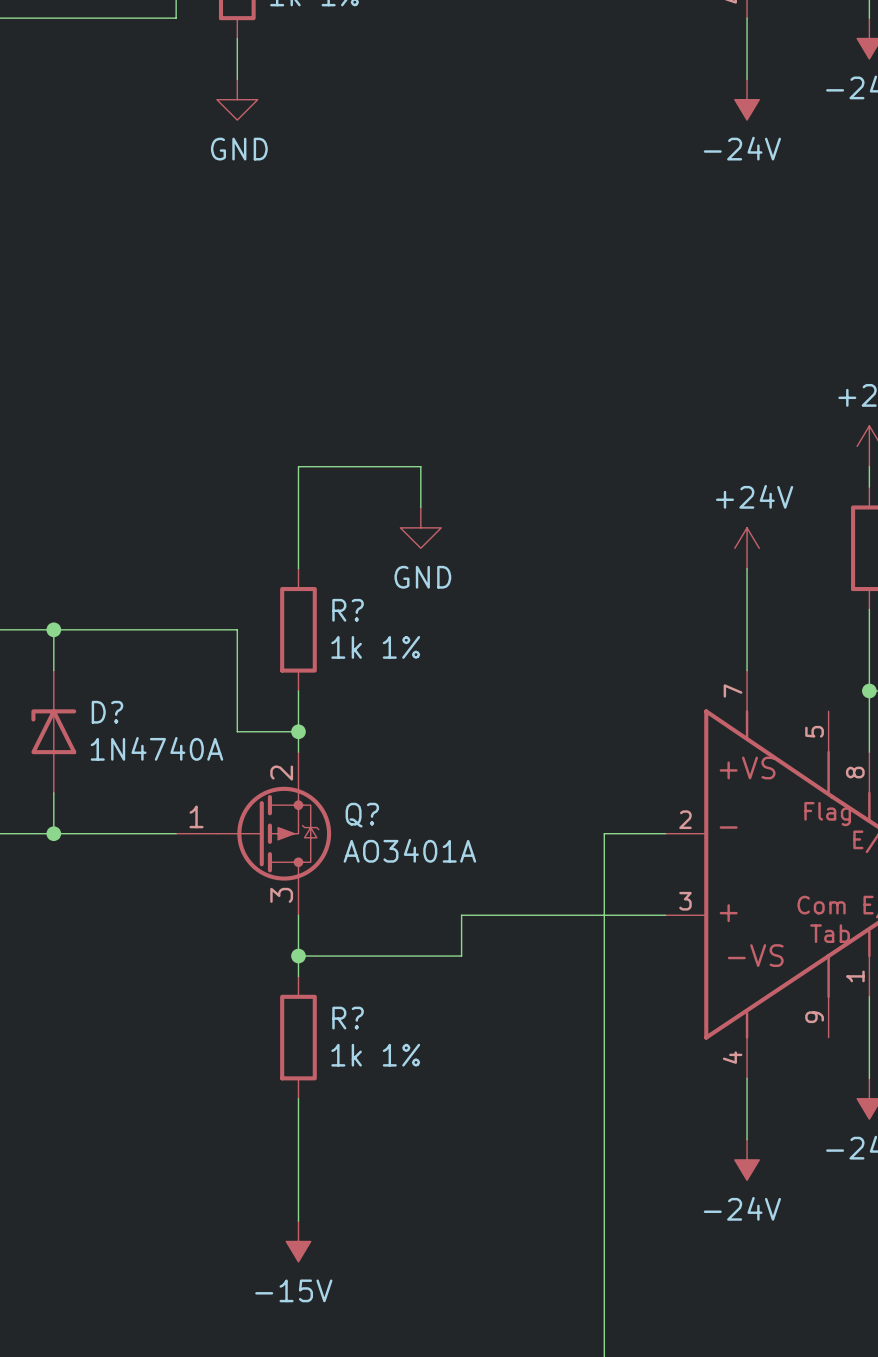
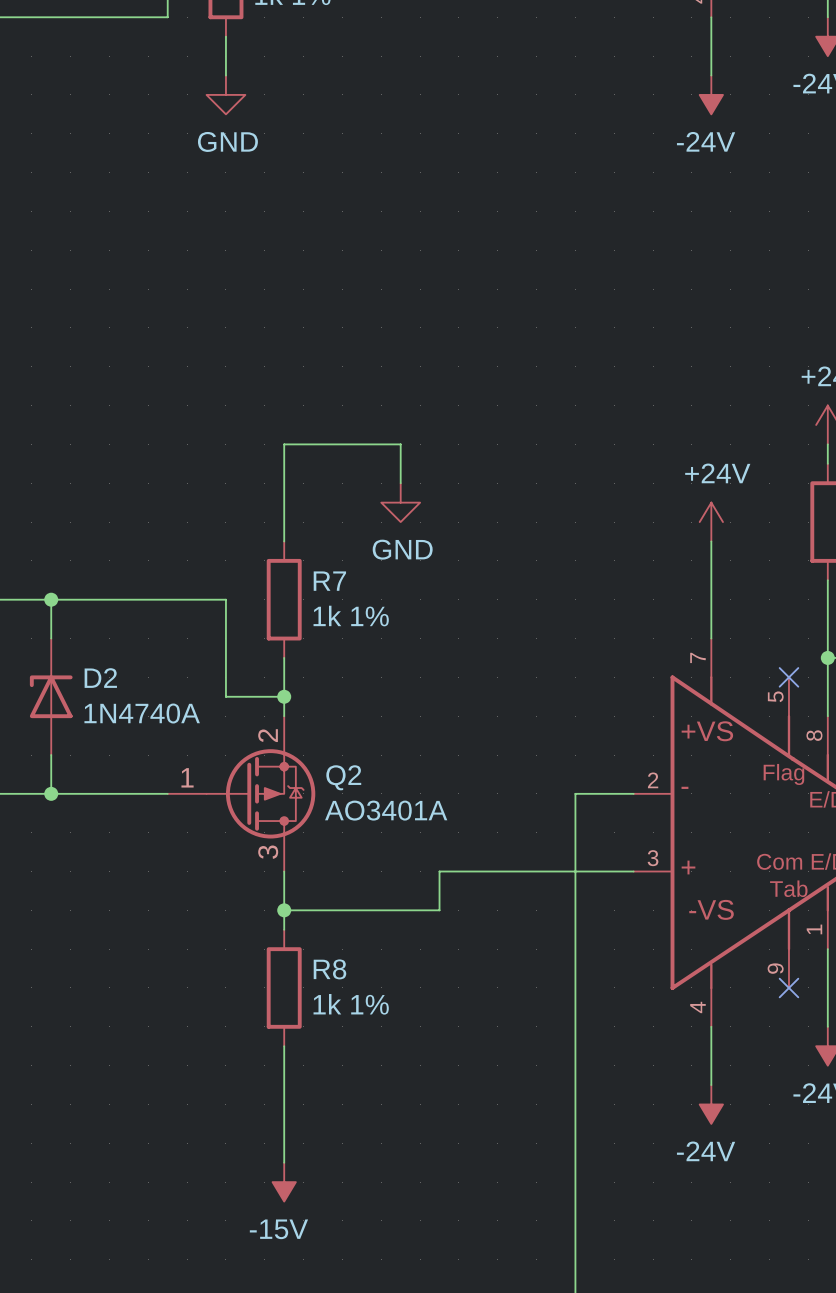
R? name: R? (348, 610) -> R7 (329, 581)
no-connect mark: none -> (788, 677)
D? name: D? (107, 712) -> D2 (100, 678)
Q? name: Q? (362, 815) -> Q2 (343, 777)
R? name: R? (348, 1018) -> R8 (329, 969)
no-connect mark: none -> (788, 987)

